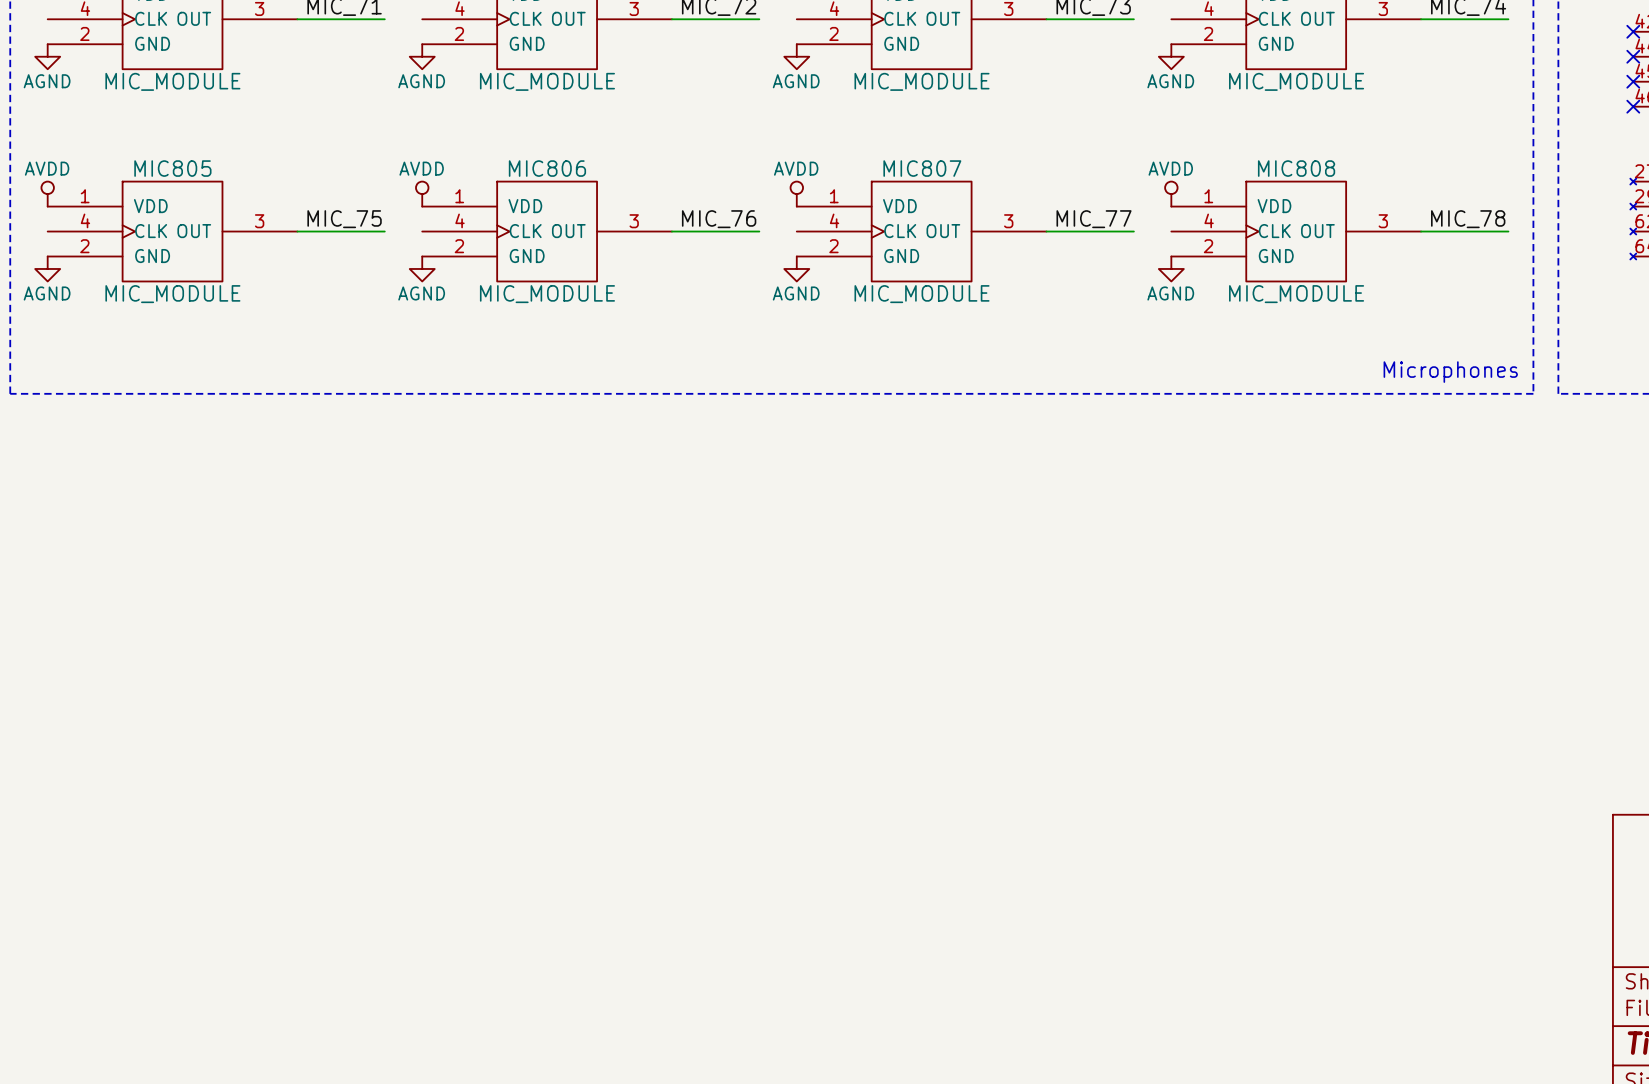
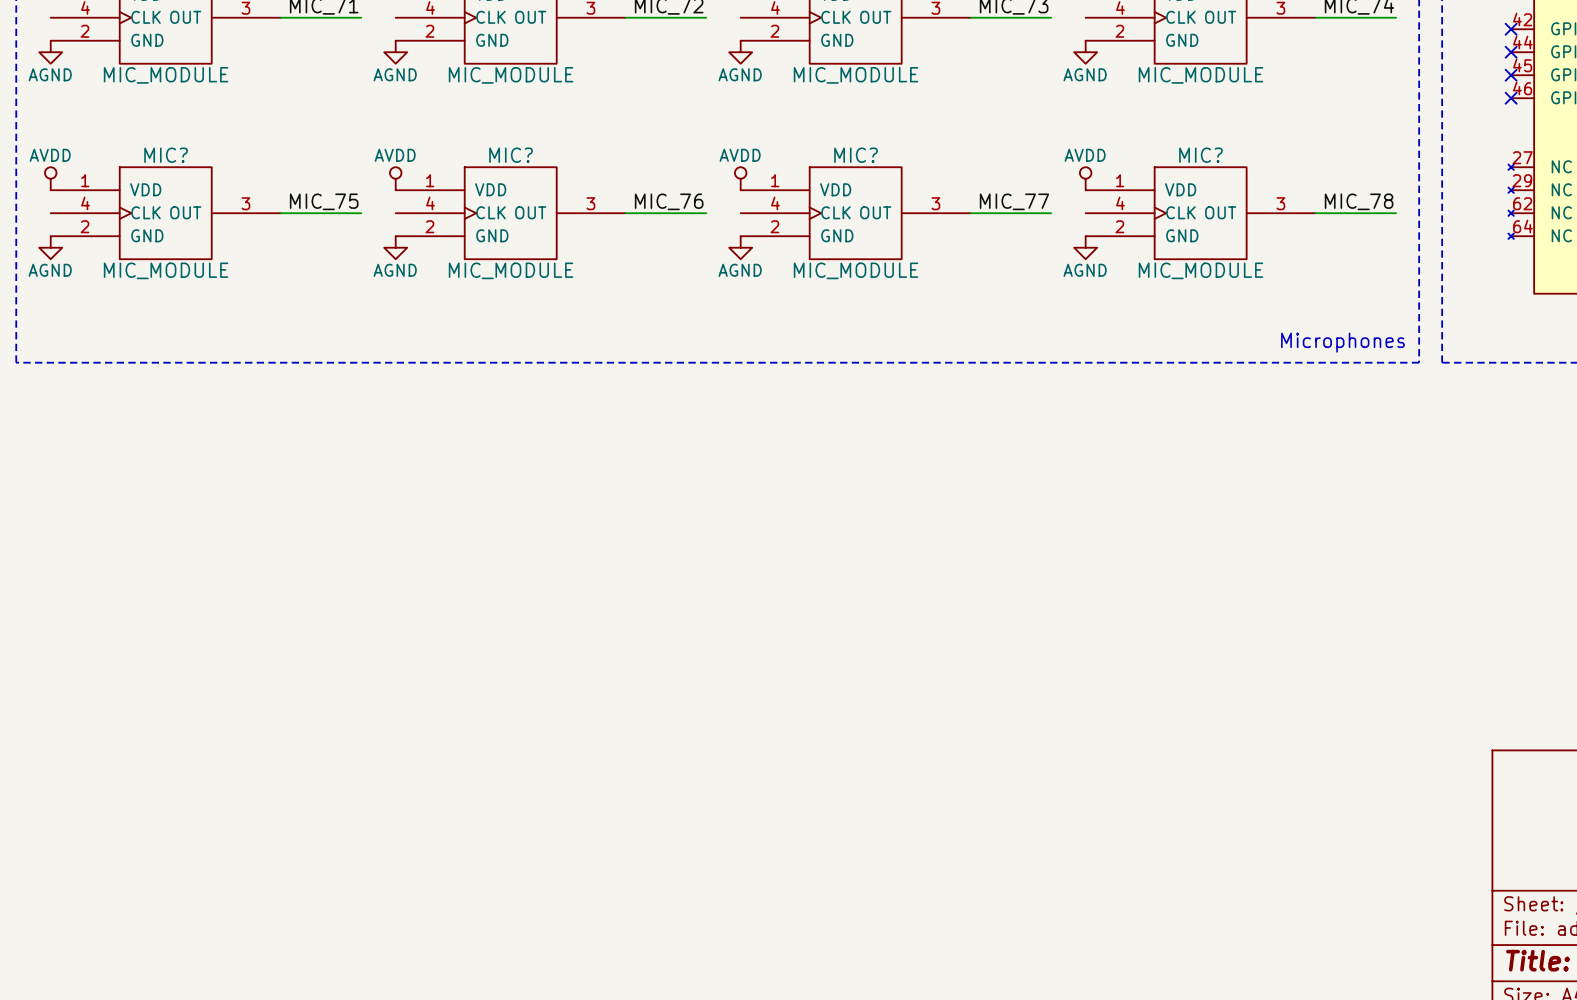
MIC805 name: MIC805 (172, 168) -> MIC? (166, 155)
MIC806 name: MIC806 (547, 168) -> MIC? (511, 155)
MIC807 name: MIC807 (922, 168) -> MIC? (856, 155)
MIC808 name: MIC808 (1296, 168) -> MIC? (1200, 155)

